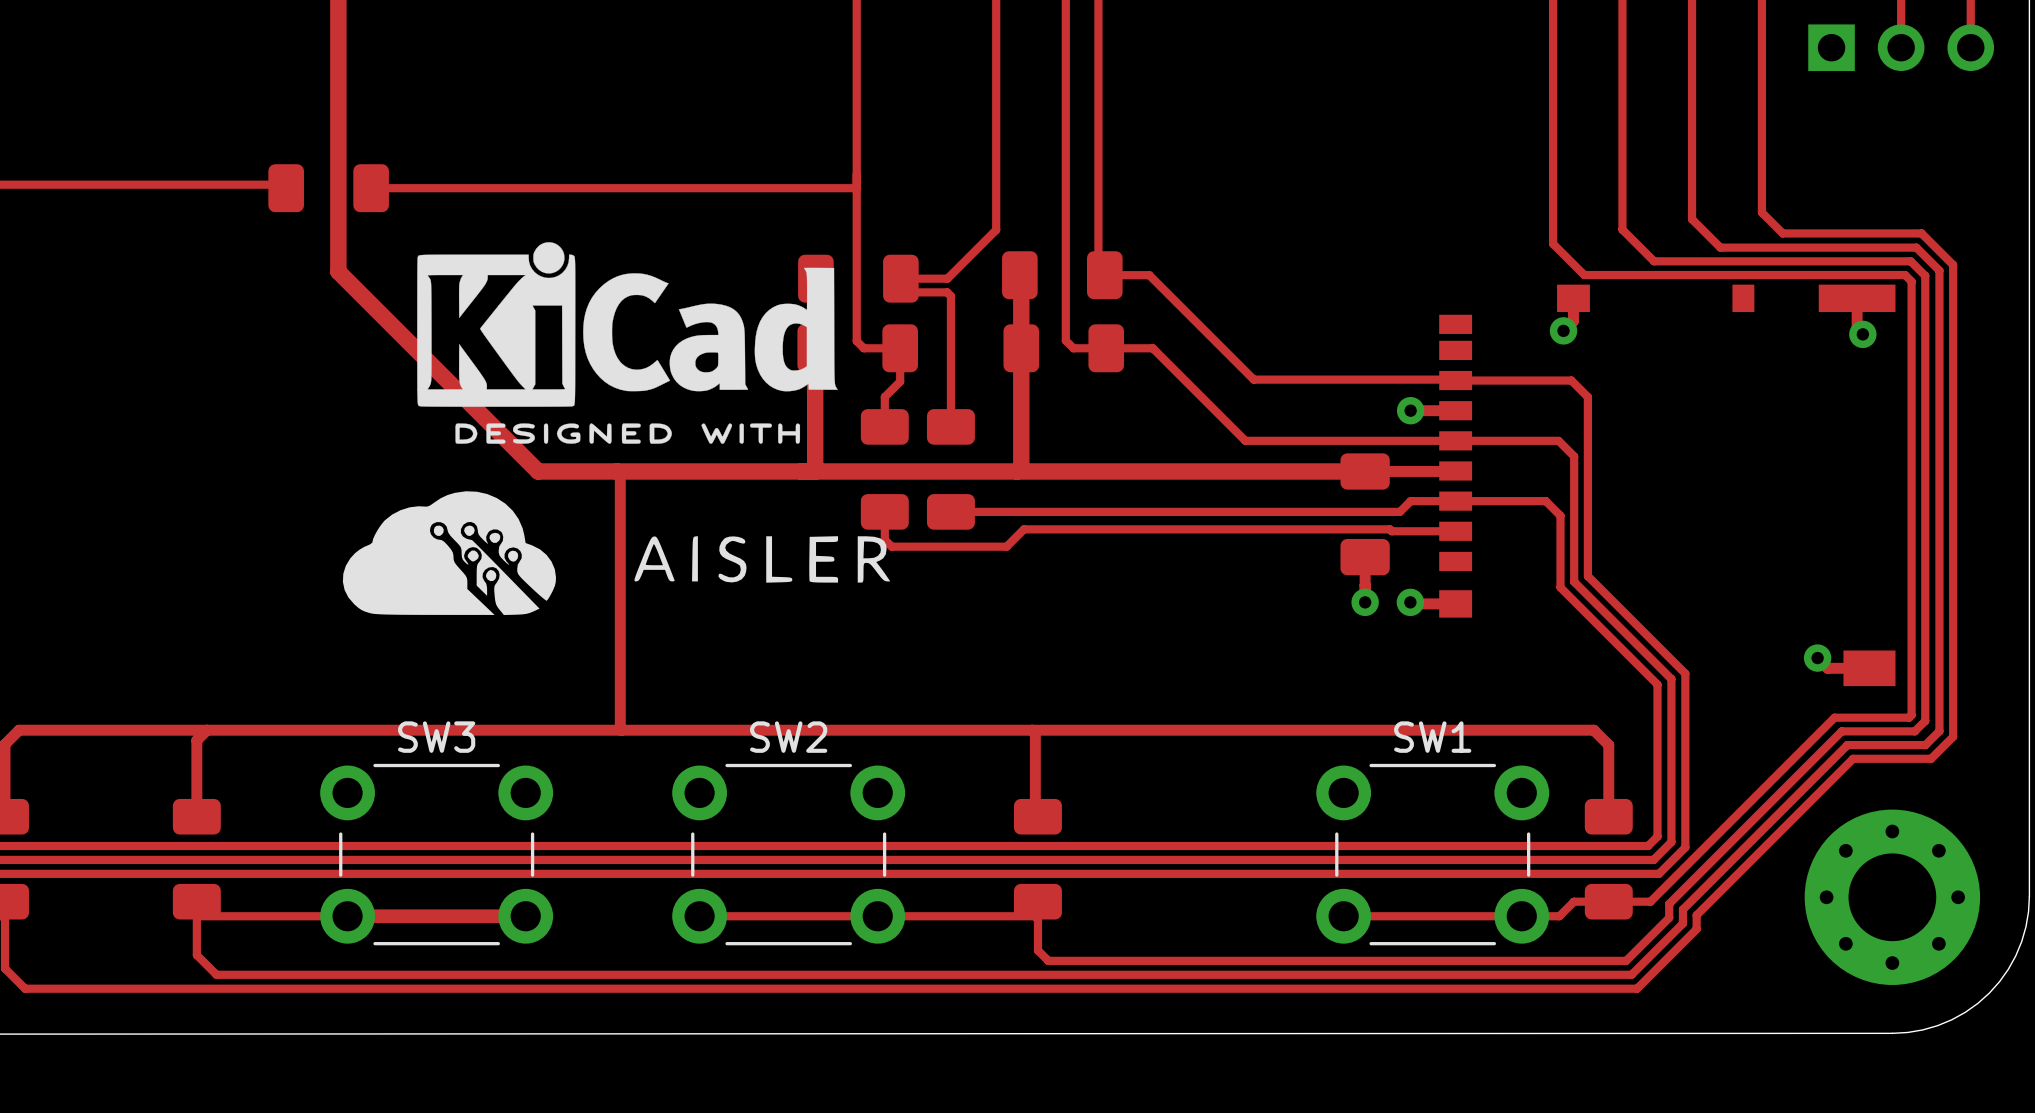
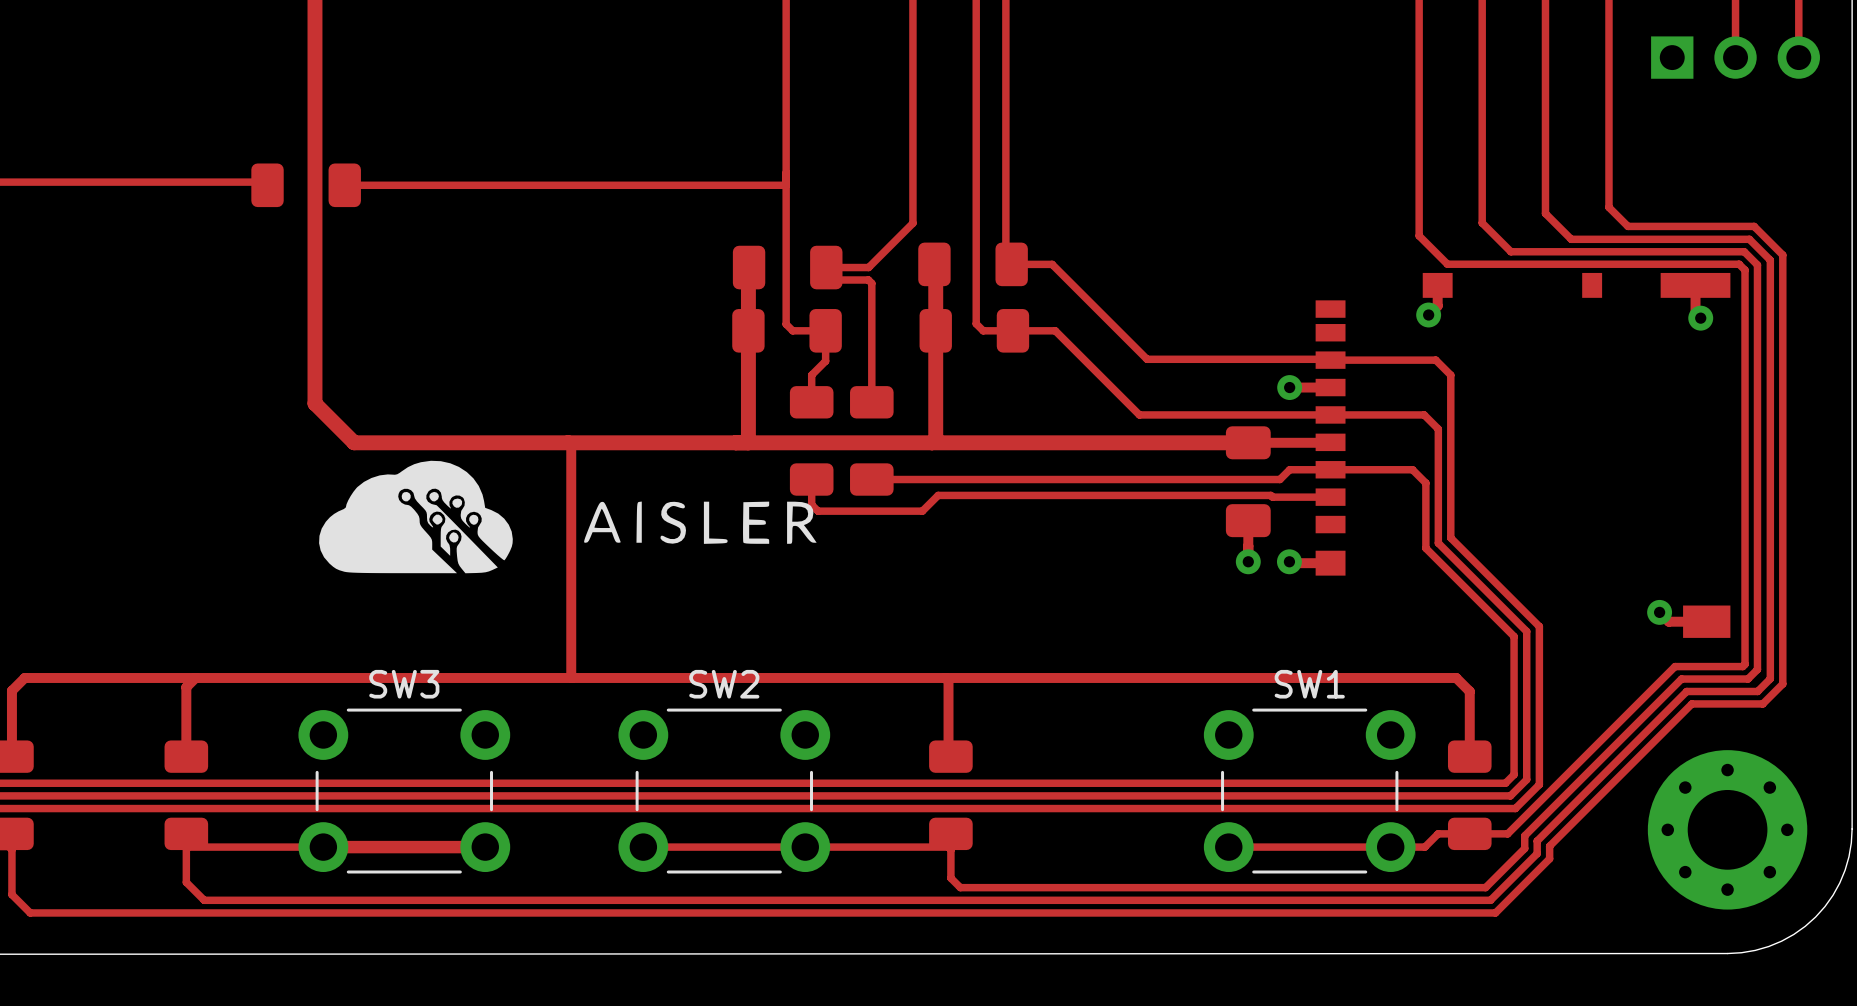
drawing: [417, 242, 838, 444] -> none
top track: (338, 271) (538, 471) -> (314, 261) (314, 403) (354, 442) (496, 442)

